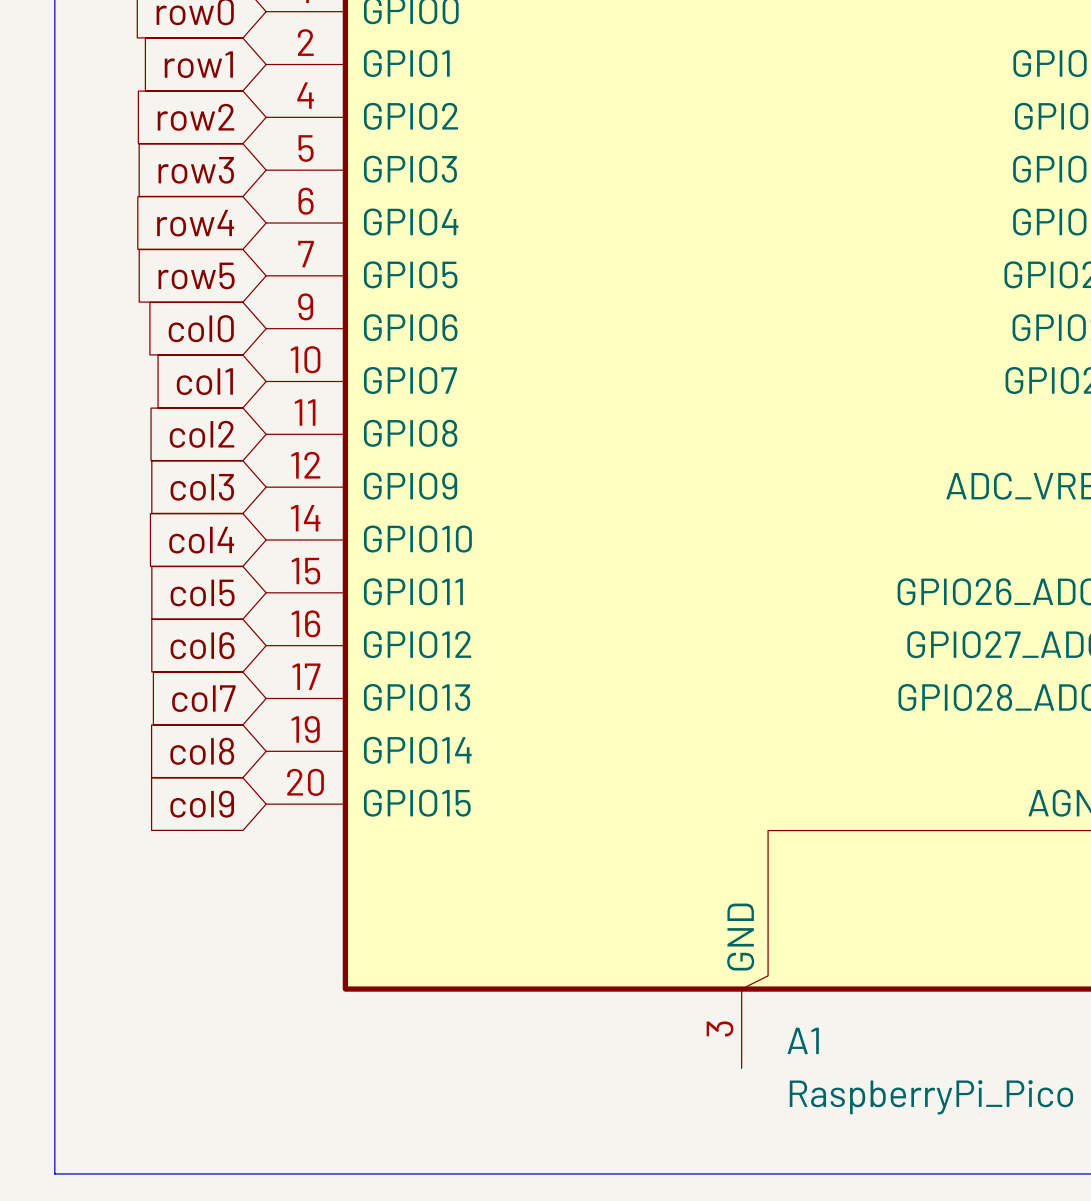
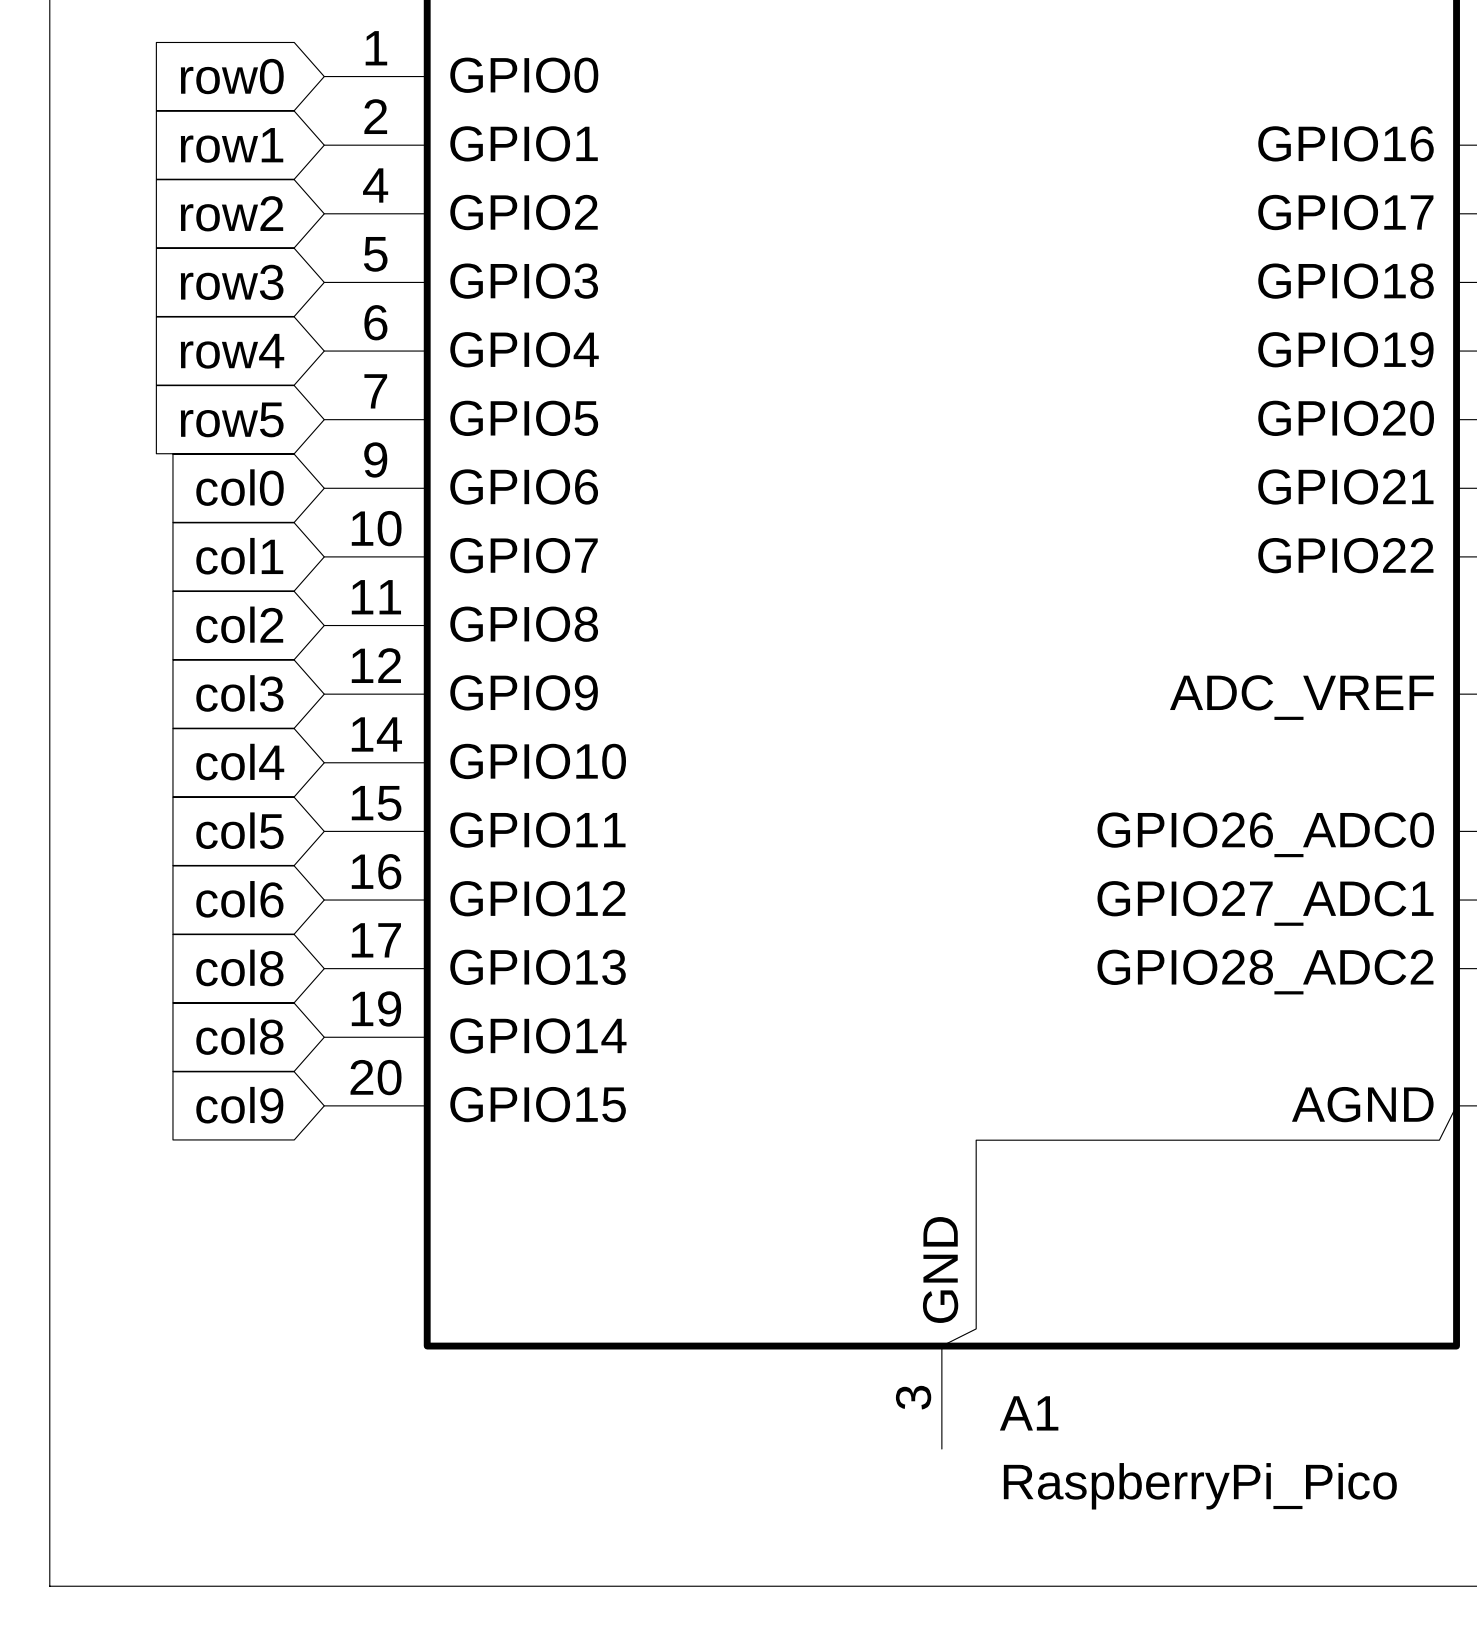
global label: col7 (203, 698) -> col8 (239, 967)

